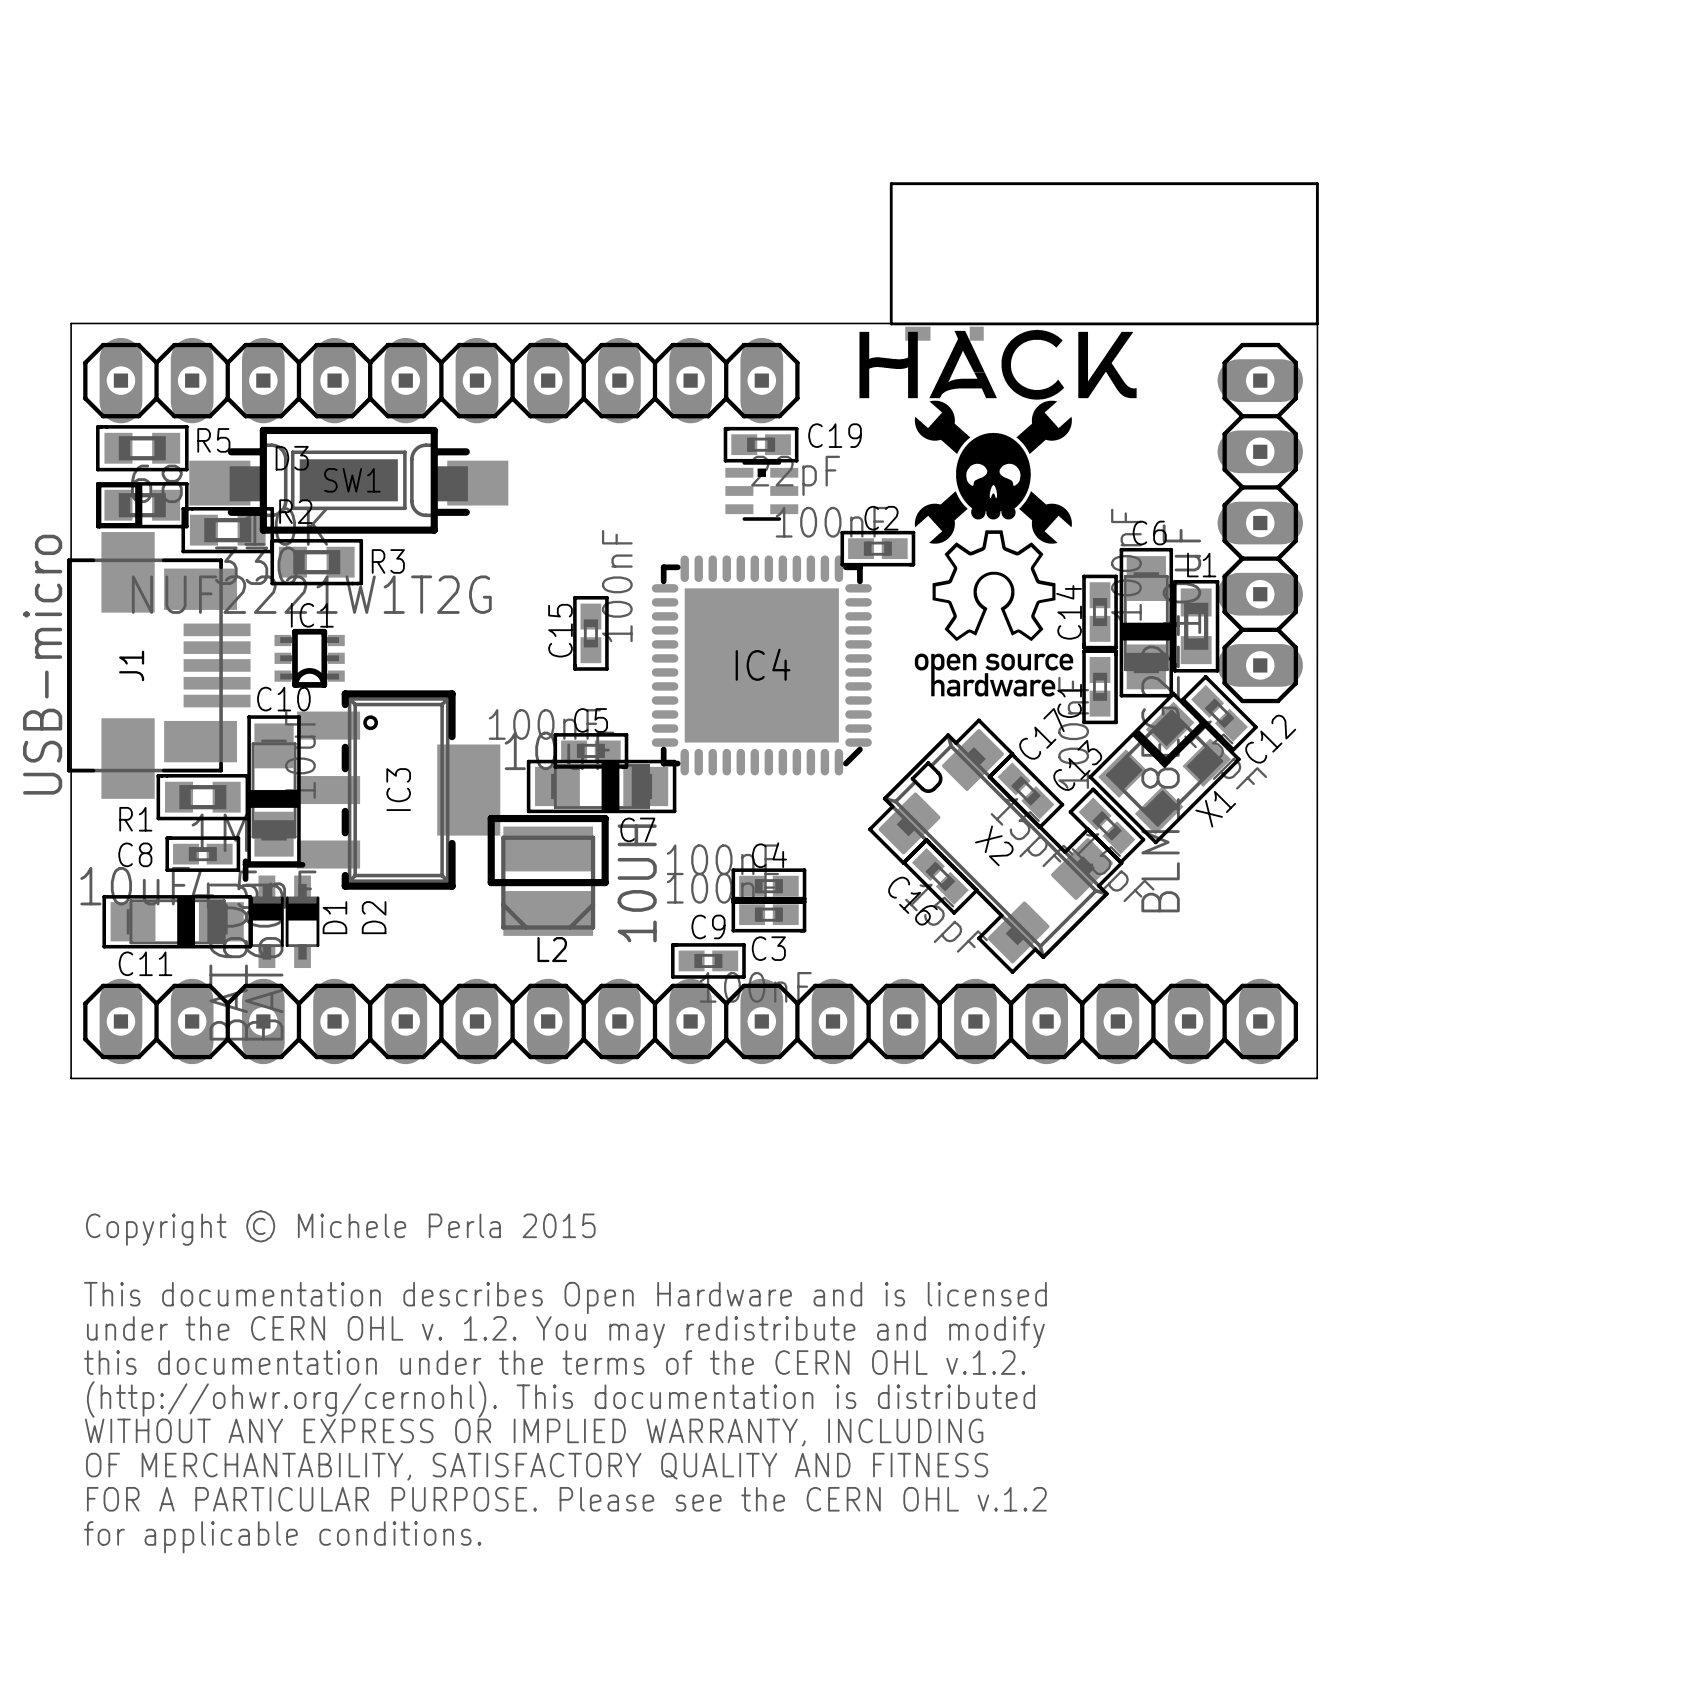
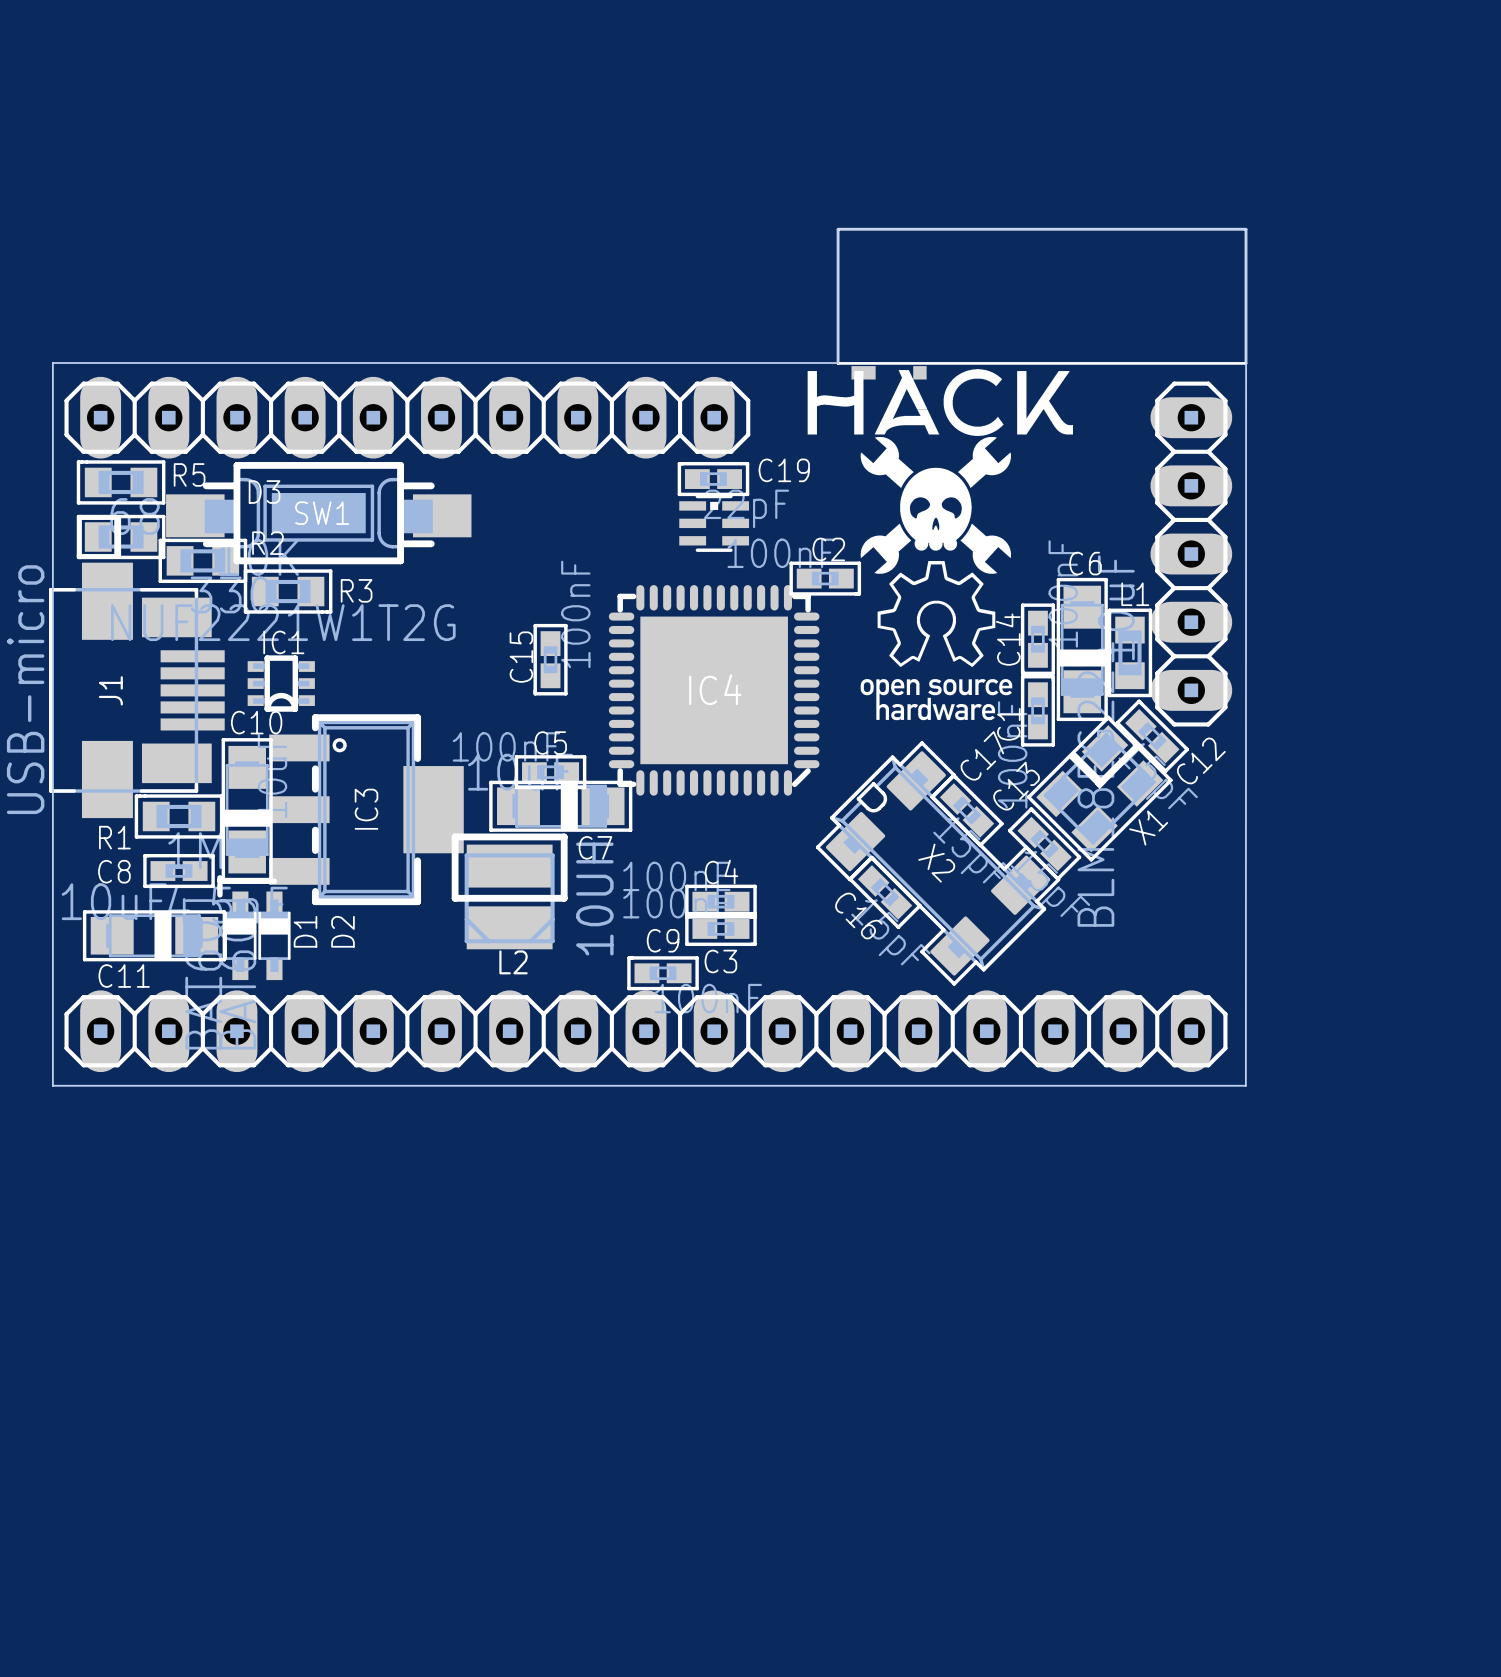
text: Copyright © Michele Perla 2015 (340, 1228) -> none
text: This documentation describes Open Hardware and is licensed (565, 1297) -> none
text: under the CERN OHL v. 1.2. You may redistribute and modify (565, 1332) -> none
text: this documentation under the terms of the CERN OHL v.1.2. (554, 1362) -> none
text: (http://ohwr.org/cernohl). This documentation is distributed (561, 1399) -> none
text: WITHOUT ANY EXPRESS OR IMPLIED WARRANTY, INCLUDING (534, 1432) -> none
text: OF MERCHANTABILITY, SATISFACTORY QUALITY AND FITNESS (537, 1466) -> none
text: FOR A PARTICULAR PURPOSE. Please see the CERN OHL v.1.2 (566, 1499) -> none
text: for applicable conditions. (282, 1537) -> none

